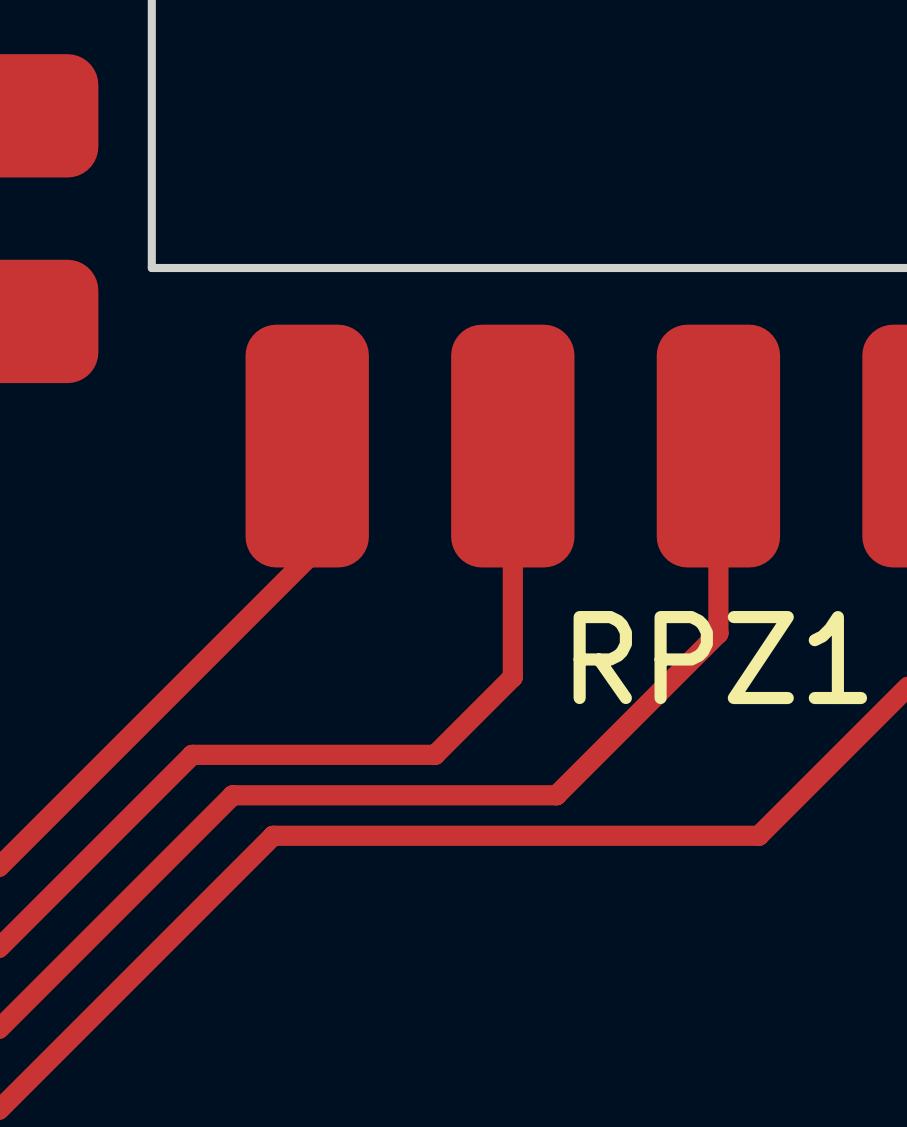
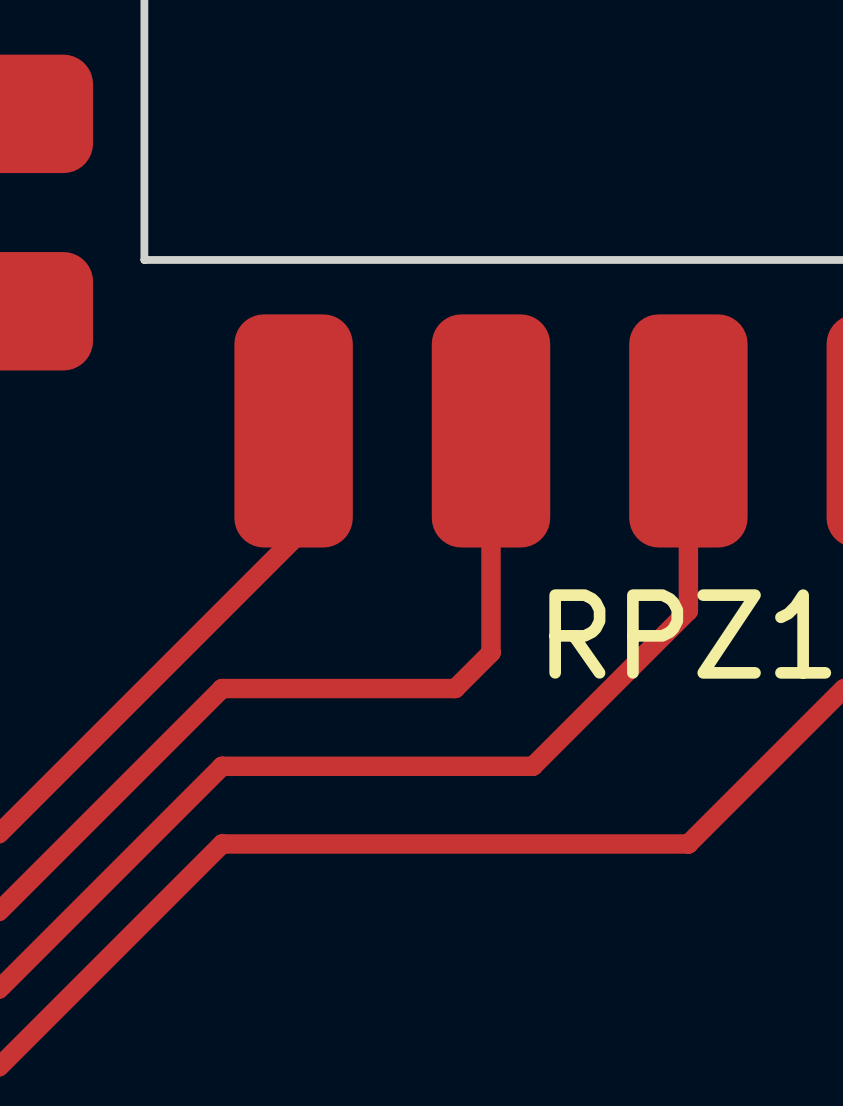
track: (475, 714) (435, 754) (192, 754) -> (455, 688) (222, 688) (183, 727)
track: (758, 835) (273, 835) (232, 876) -> (727, 805) (688, 843) (222, 843)

